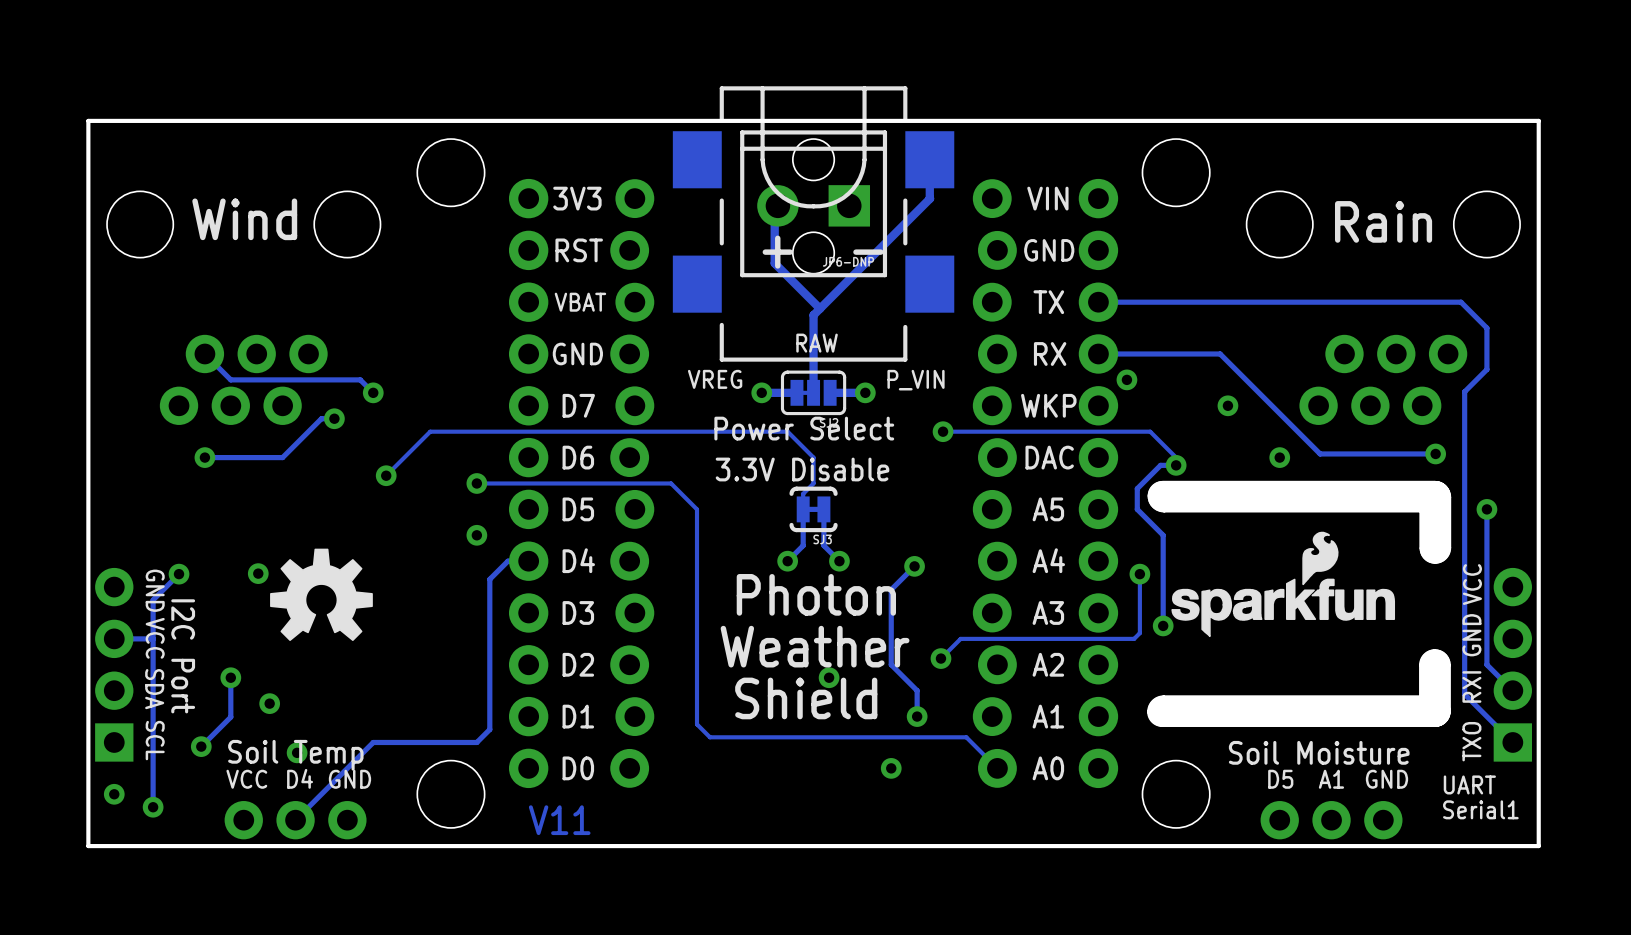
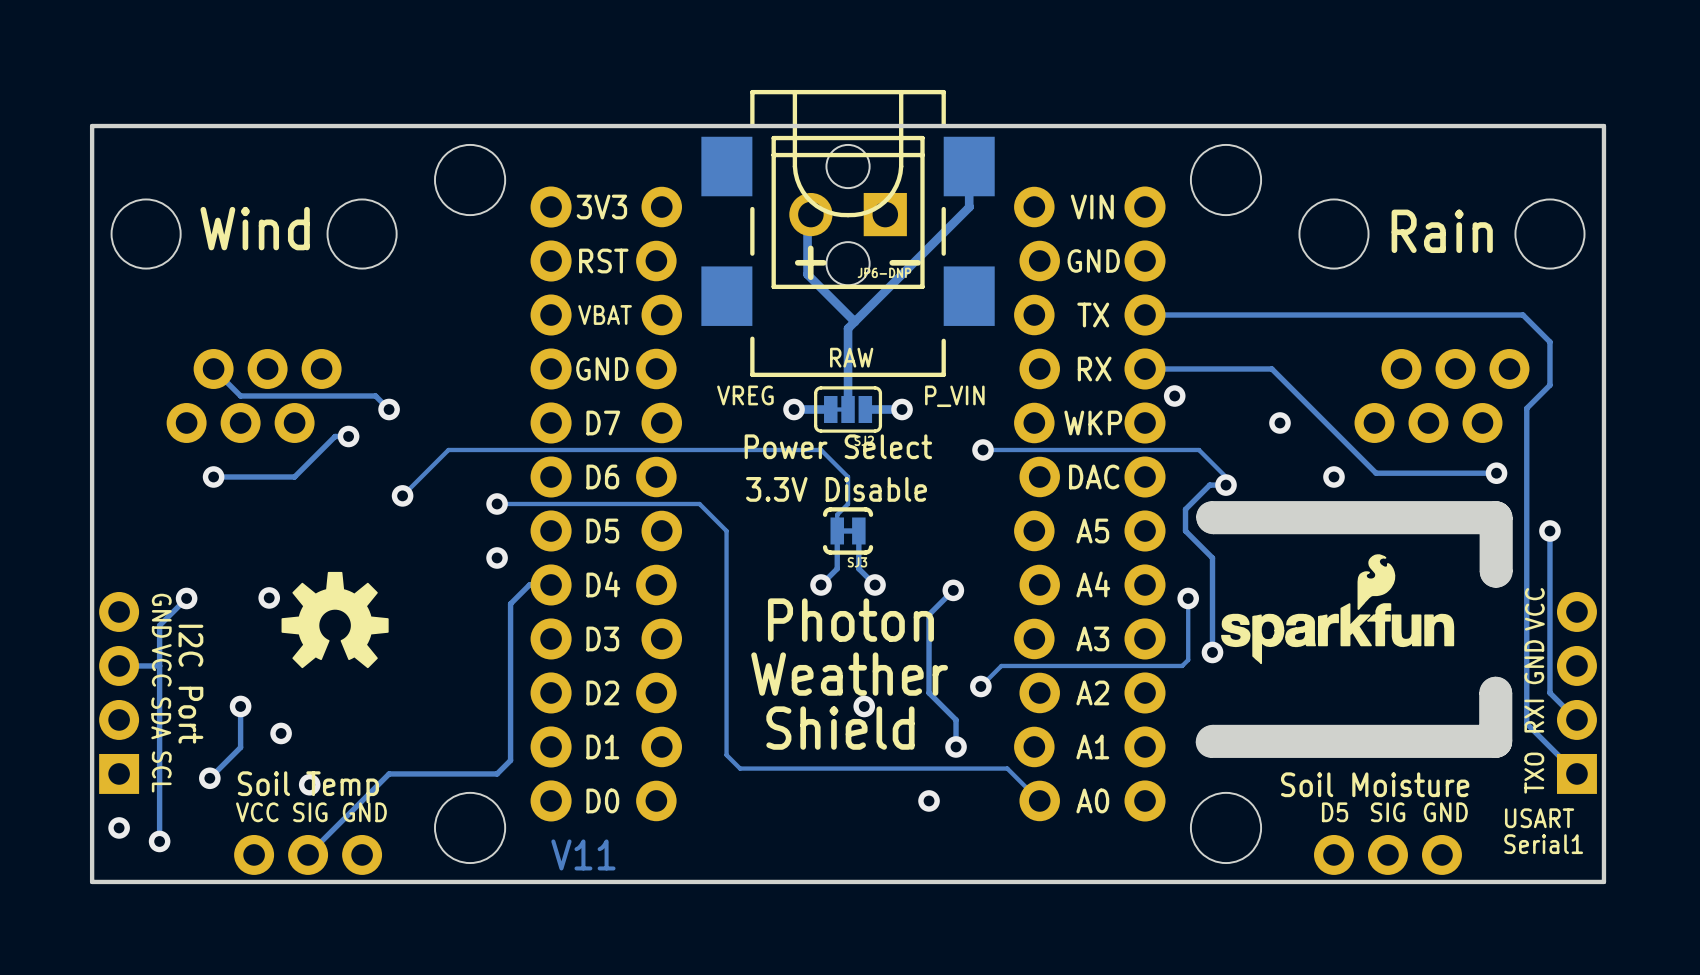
text: D4 (300, 778) -> SIG (310, 812)
text: A1 (1331, 779) -> SIG (1388, 812)
text: UART (1469, 784) -> USART (1539, 818)

